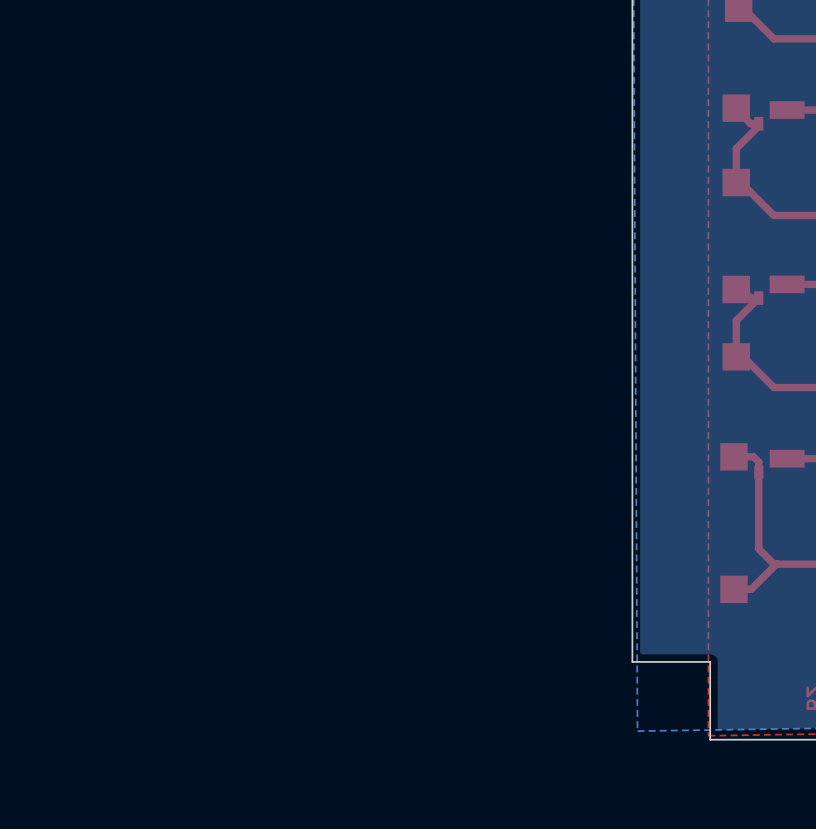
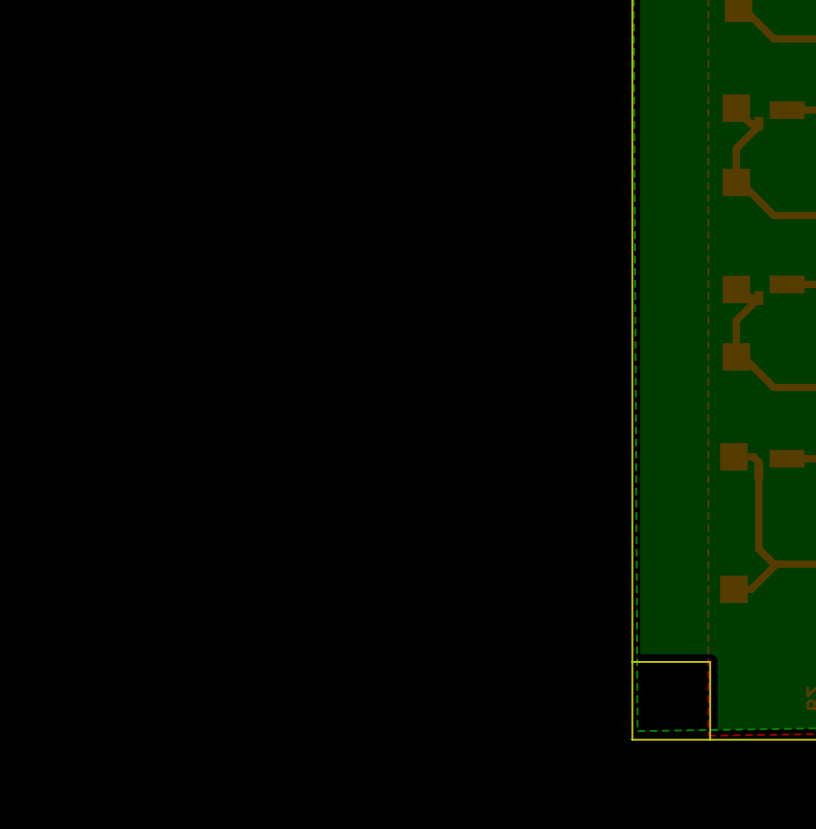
board edge: none -> (632, 661) (632, 739) (710, 739)

